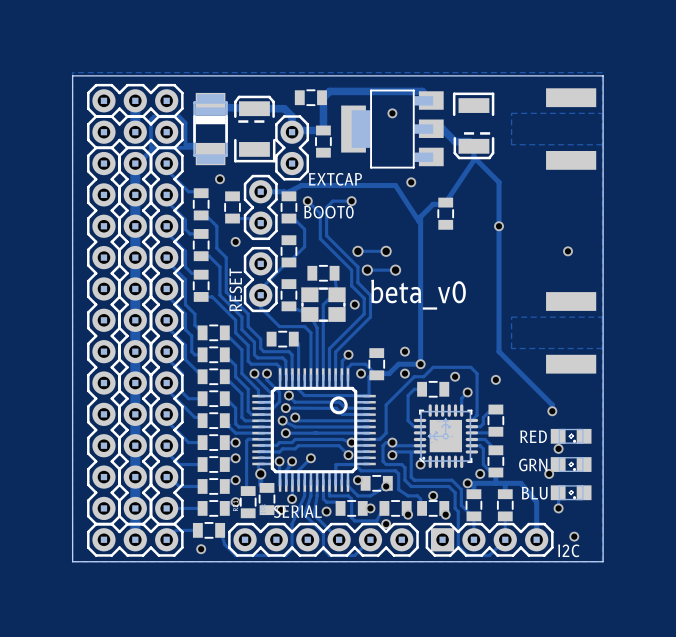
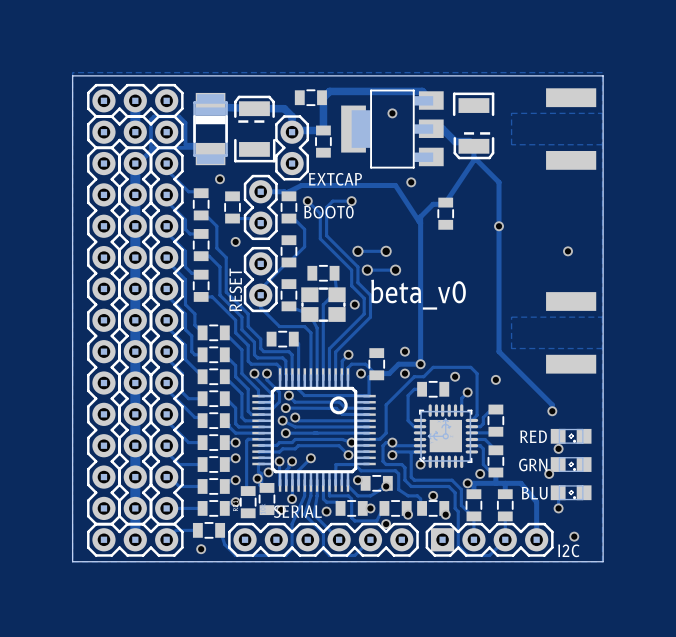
via: none -> (268, 472)
via: (260, 473) -> none
via: none -> (257, 478)

